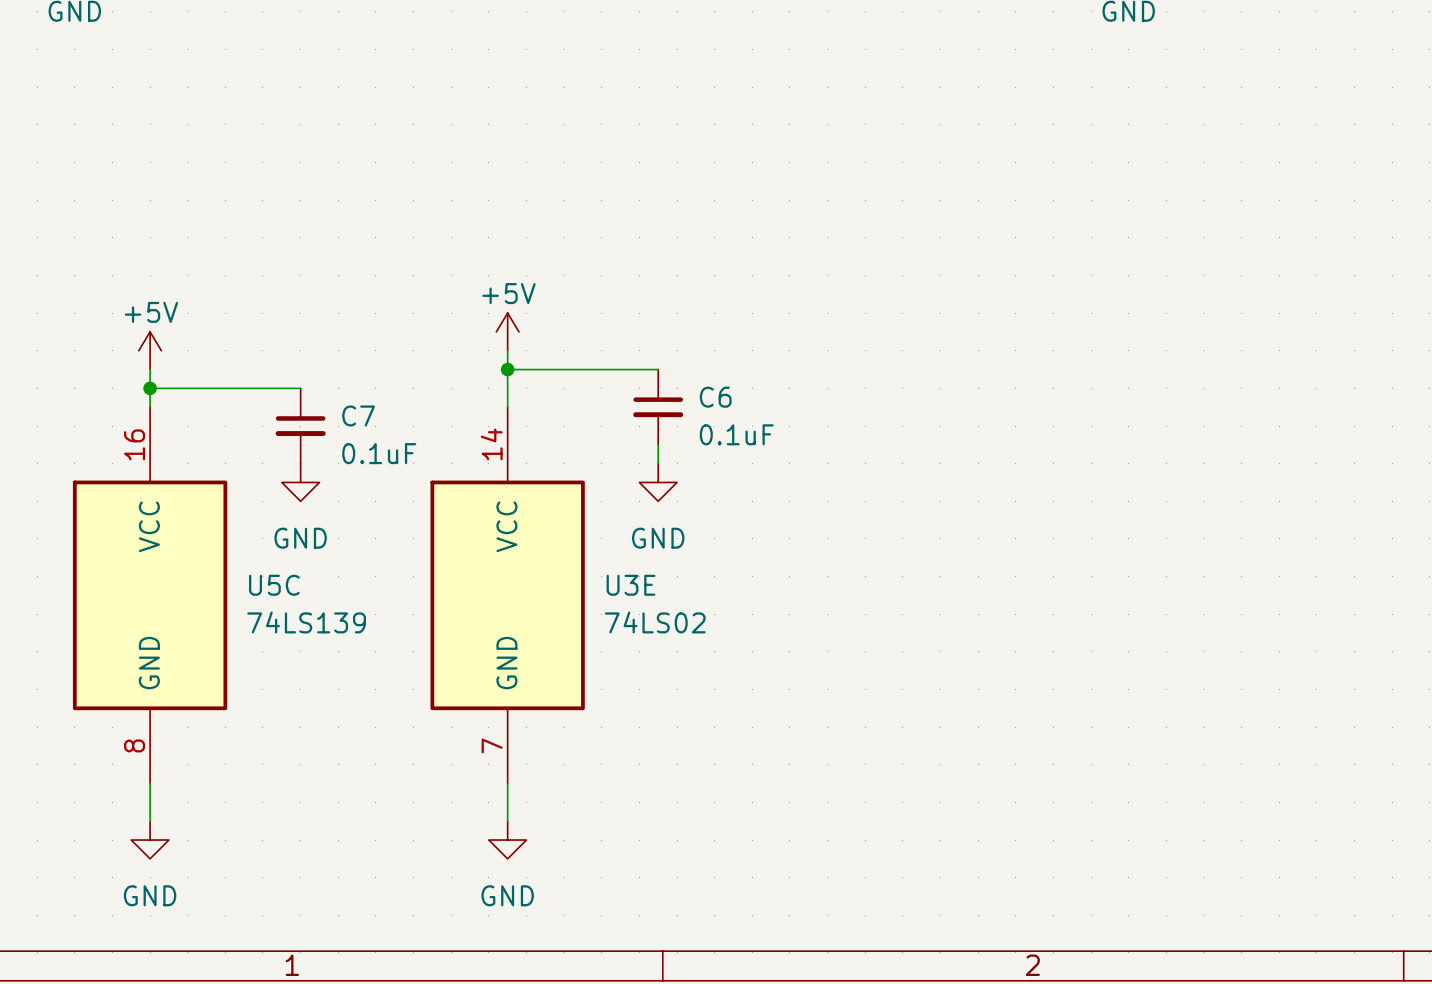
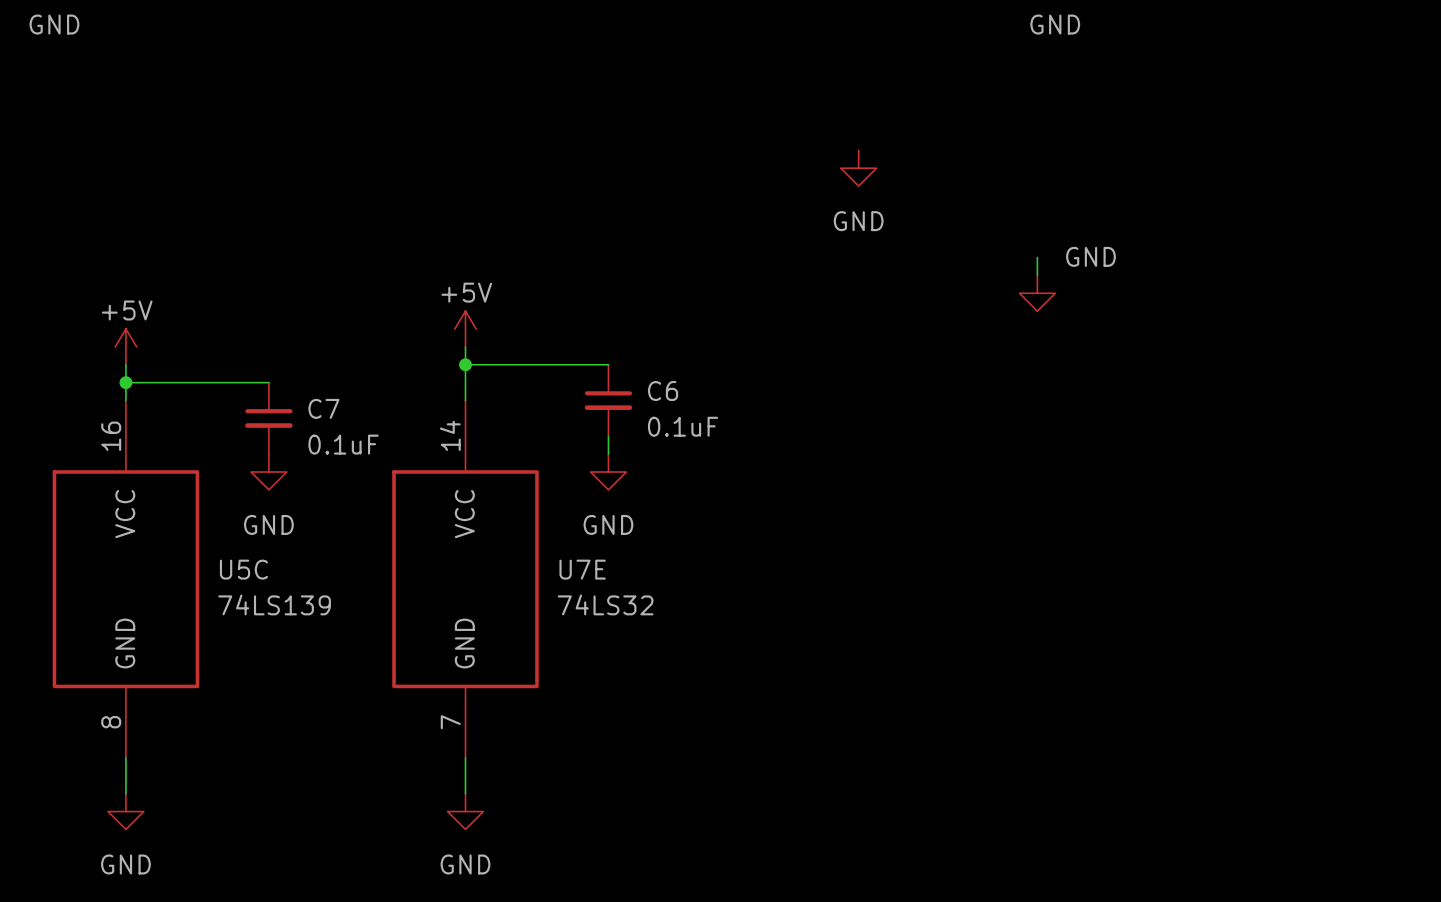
power symbol: none -> GND (858, 168)
wire: none -> (1037, 257) (1037, 275)
power symbol: none -> GND (1037, 293)
U3E name: U3E (631, 585) -> U7E (582, 569)
U3E value: 74LS02 (655, 622) -> 74LS32 (605, 604)

